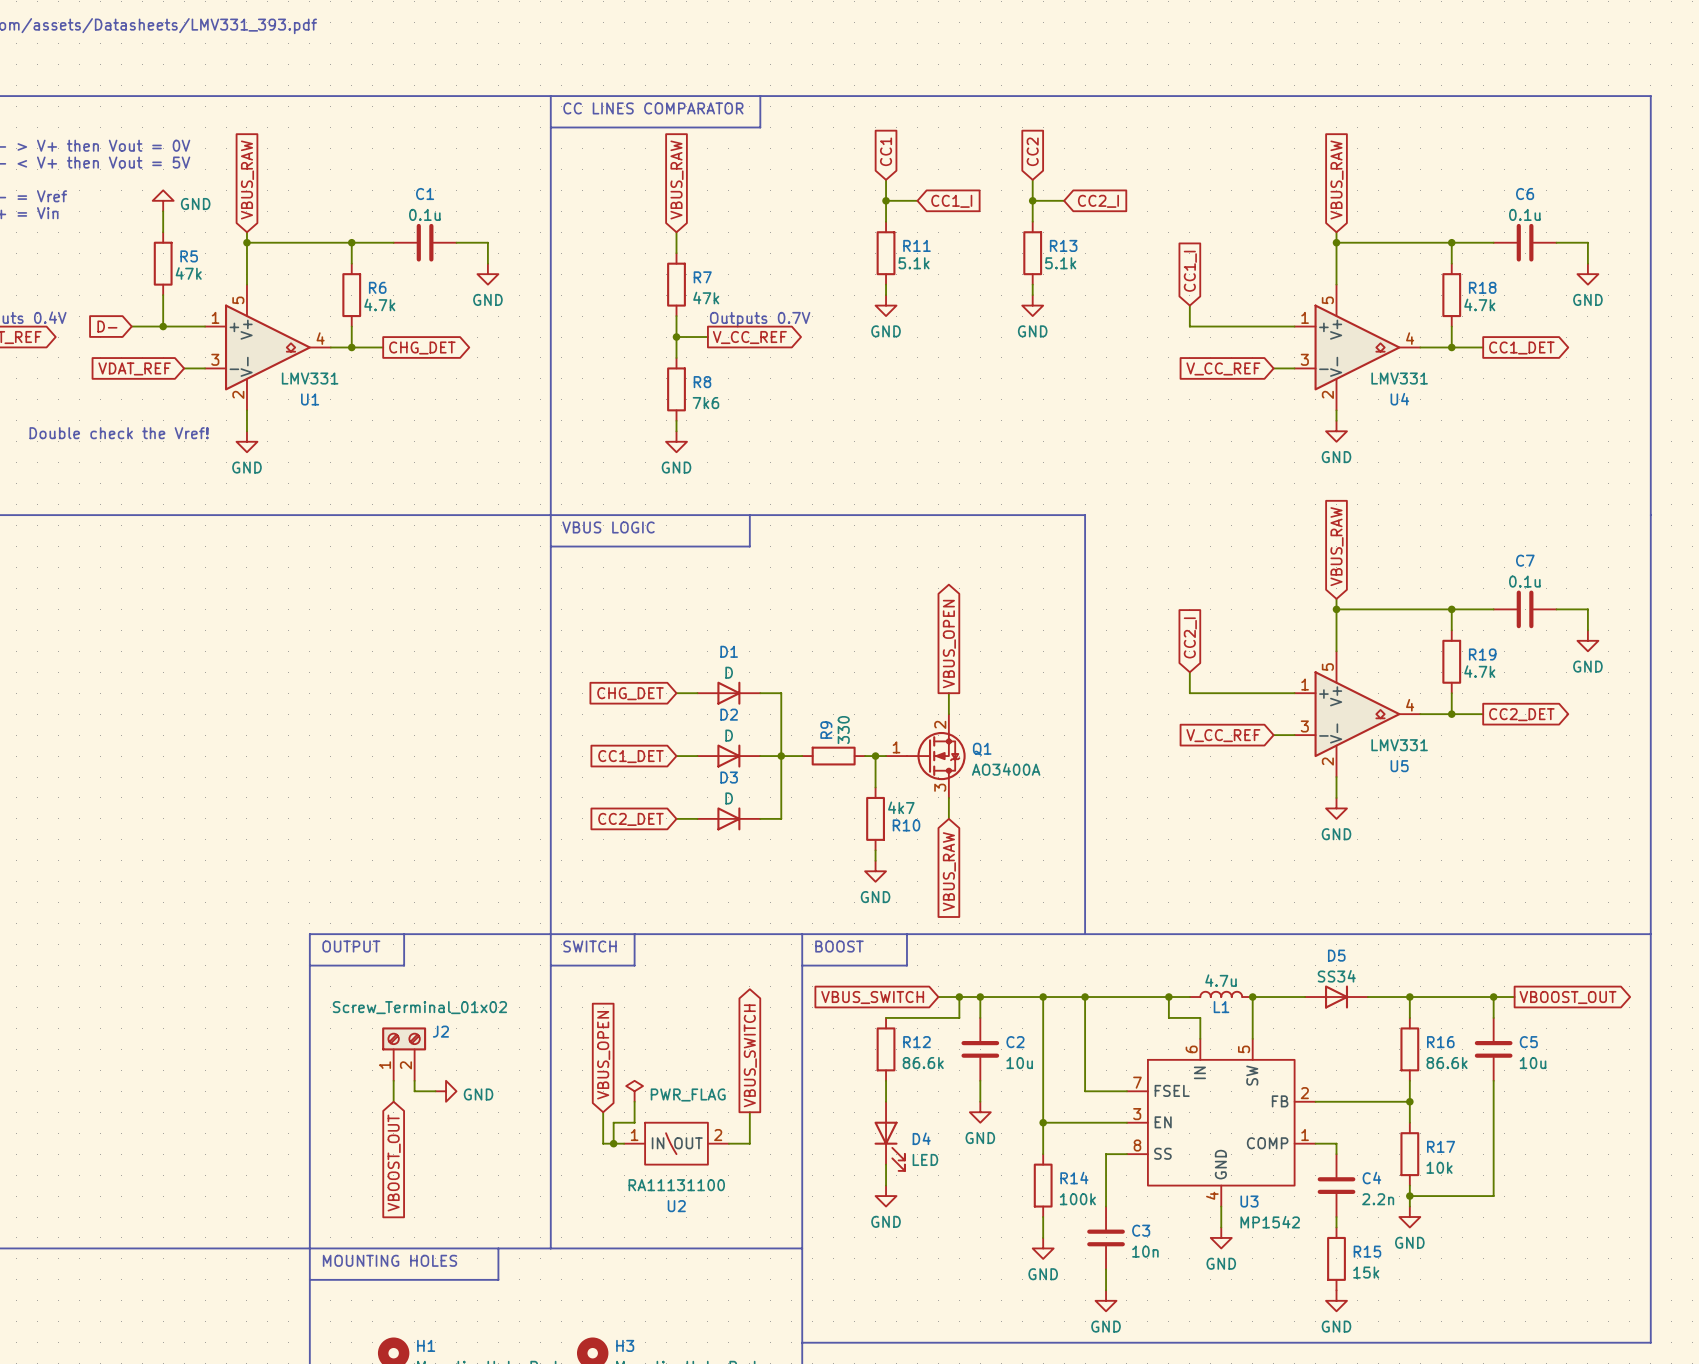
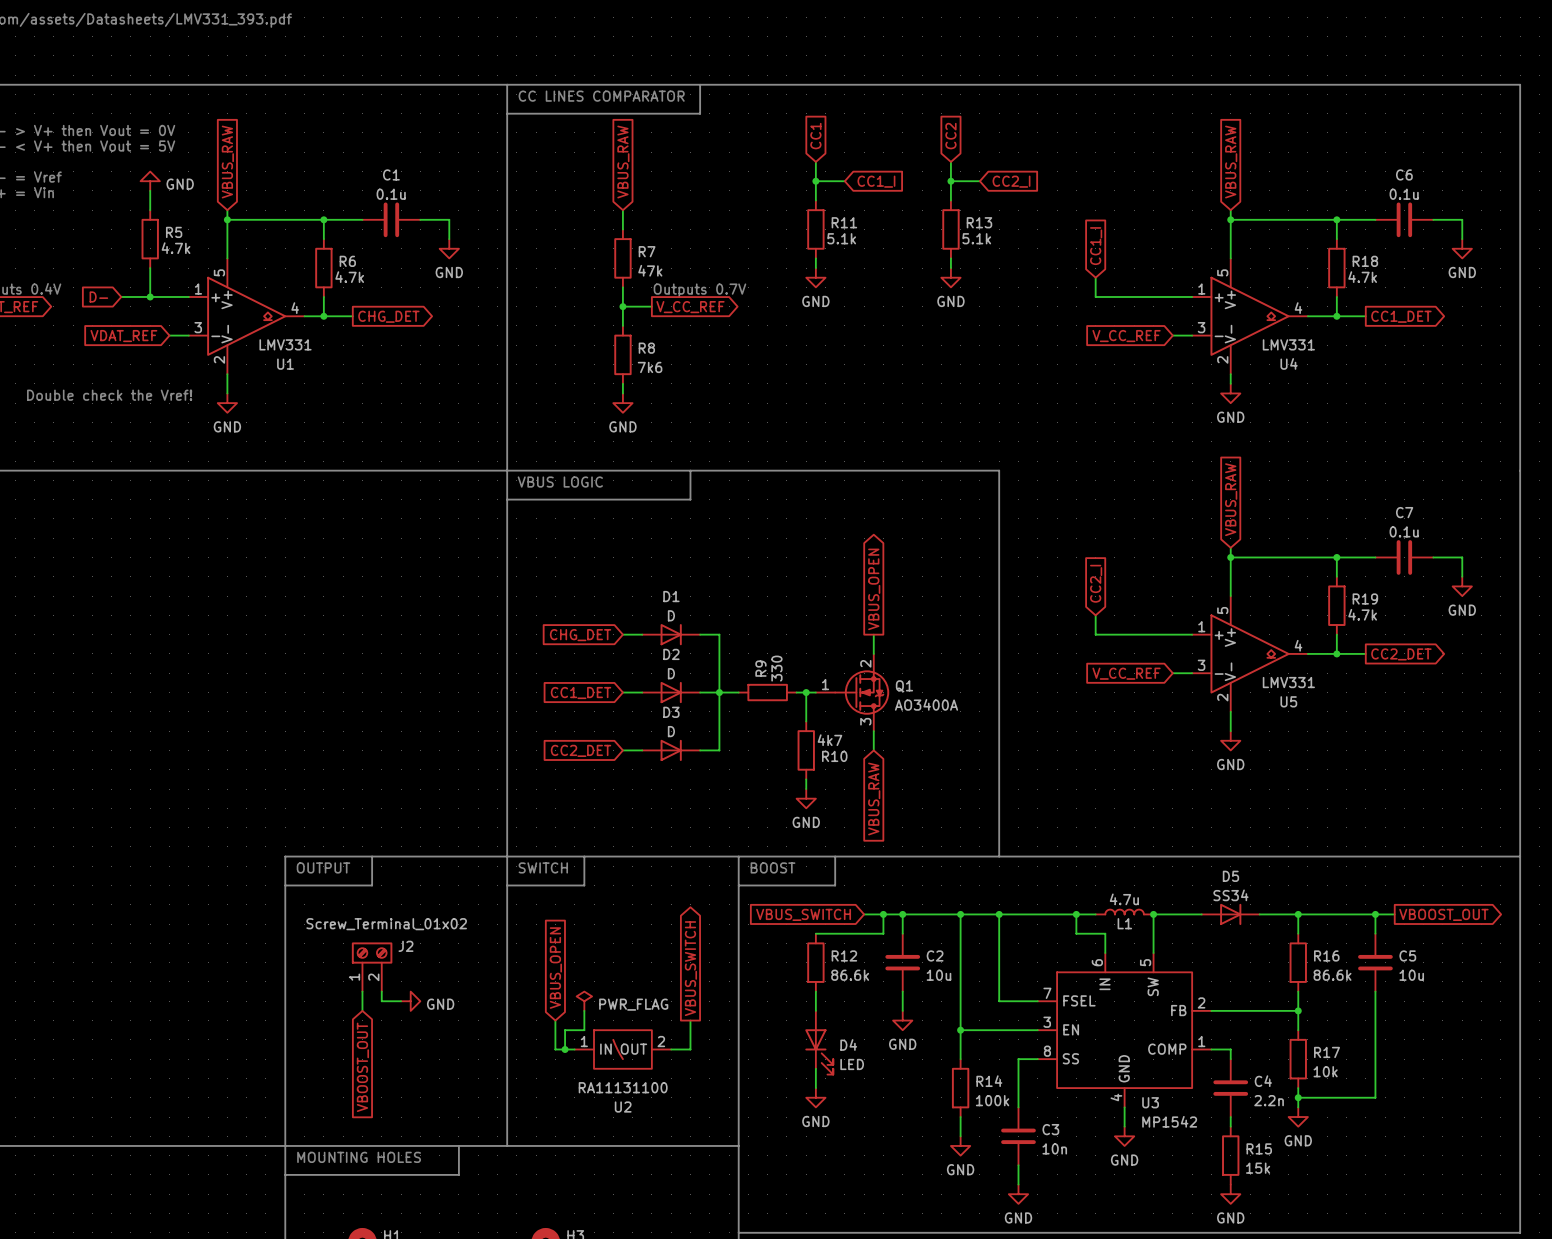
R5 value: 47k (188, 273) -> 4.7k (176, 248)

